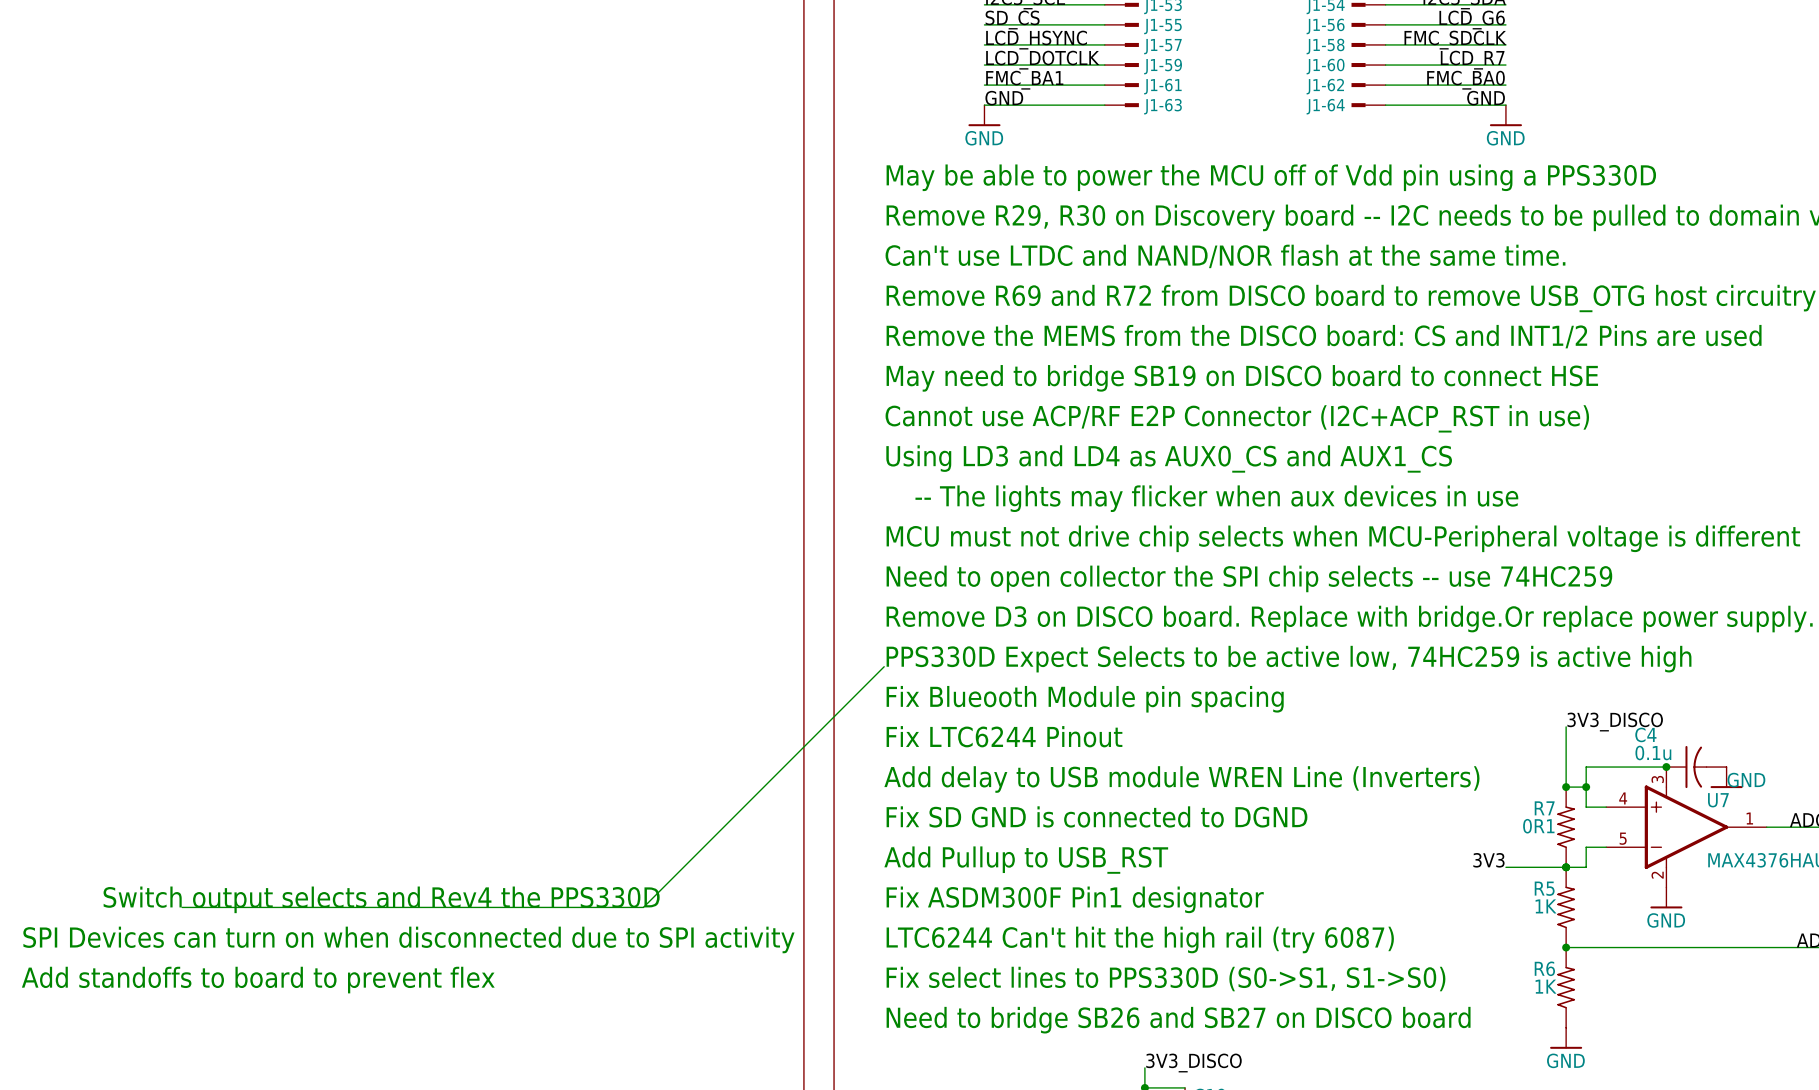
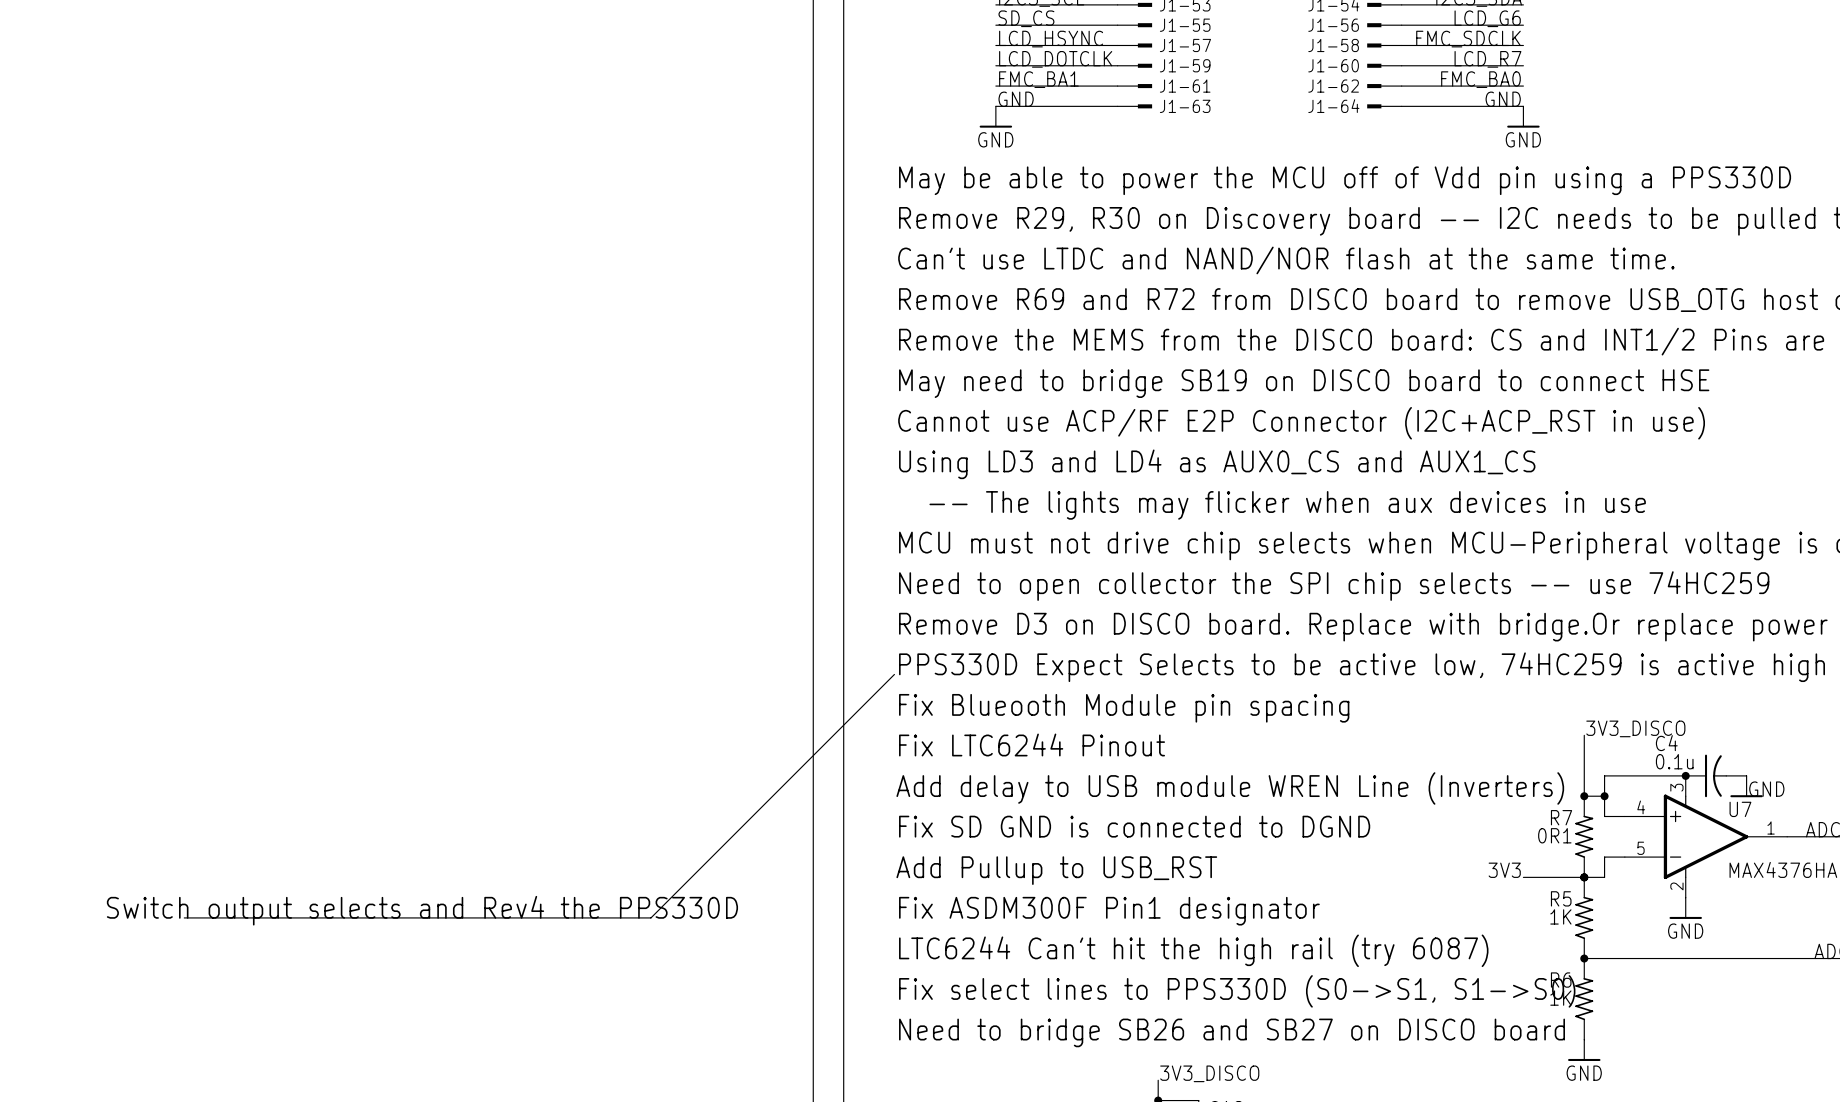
text: SPI Devices can turn on when disconnected due to SPI activity (408, 939) -> none
text: Add standoffs to board to prevent flex (258, 980) -> none

